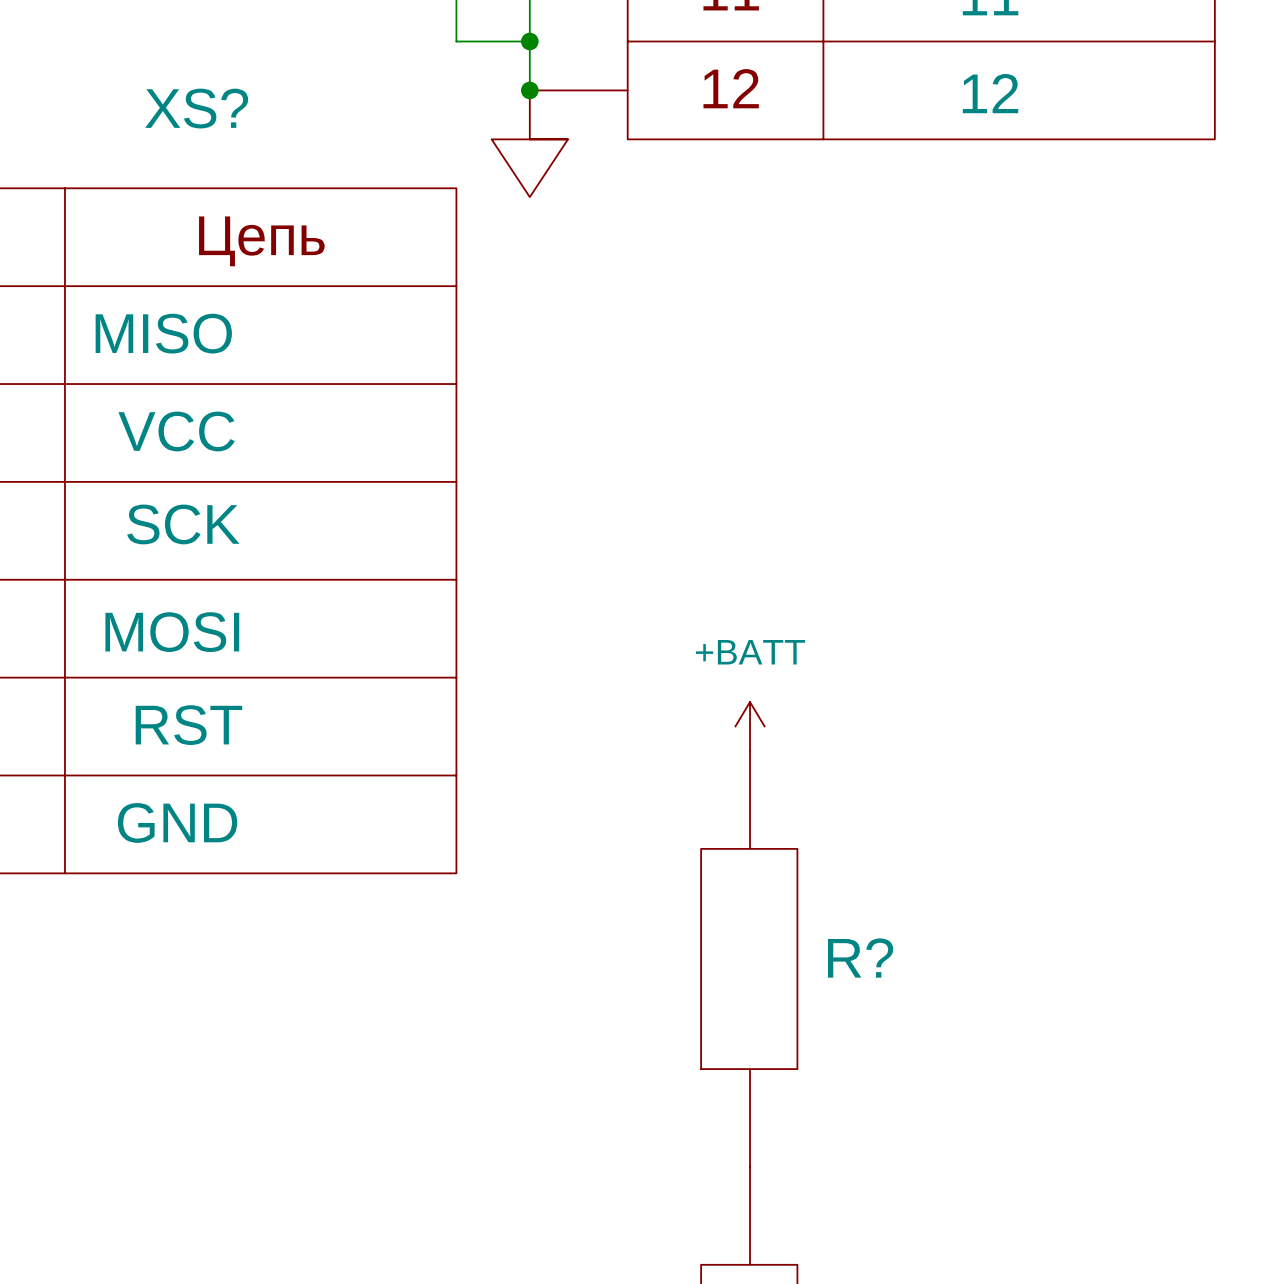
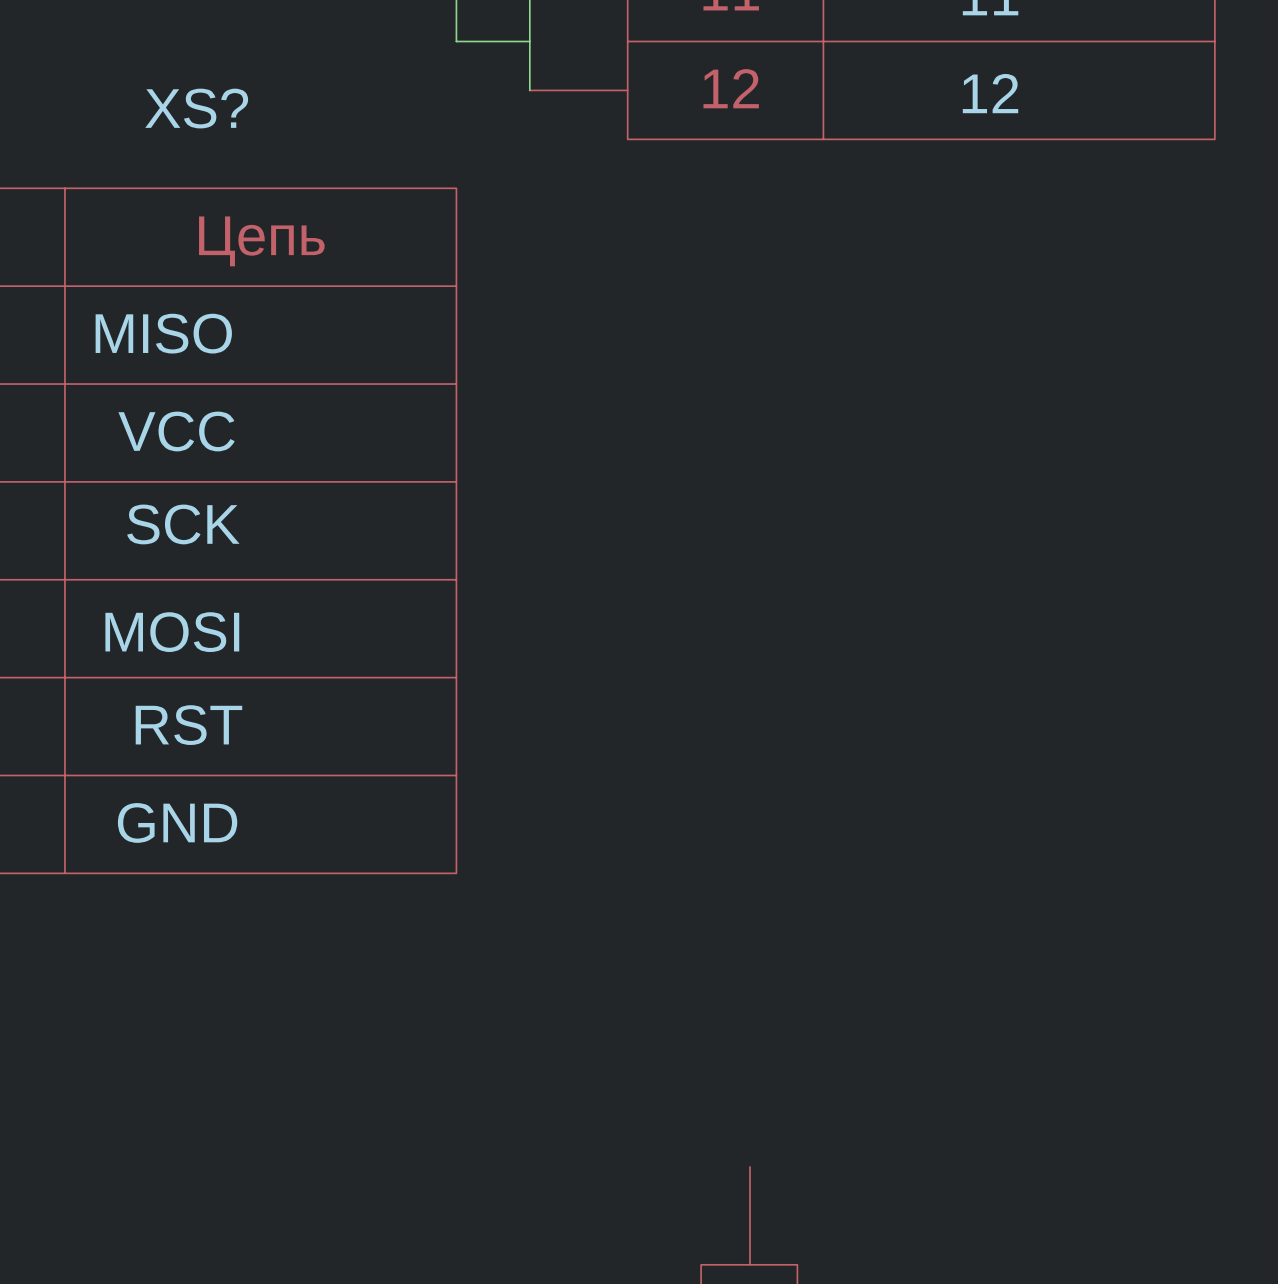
junction: (529, 41) -> none
junction: (529, 90) -> none
power symbol: (529, 143) -> none
power symbol: +BATT (750, 726) -> none
R?: (749, 958) -> none

